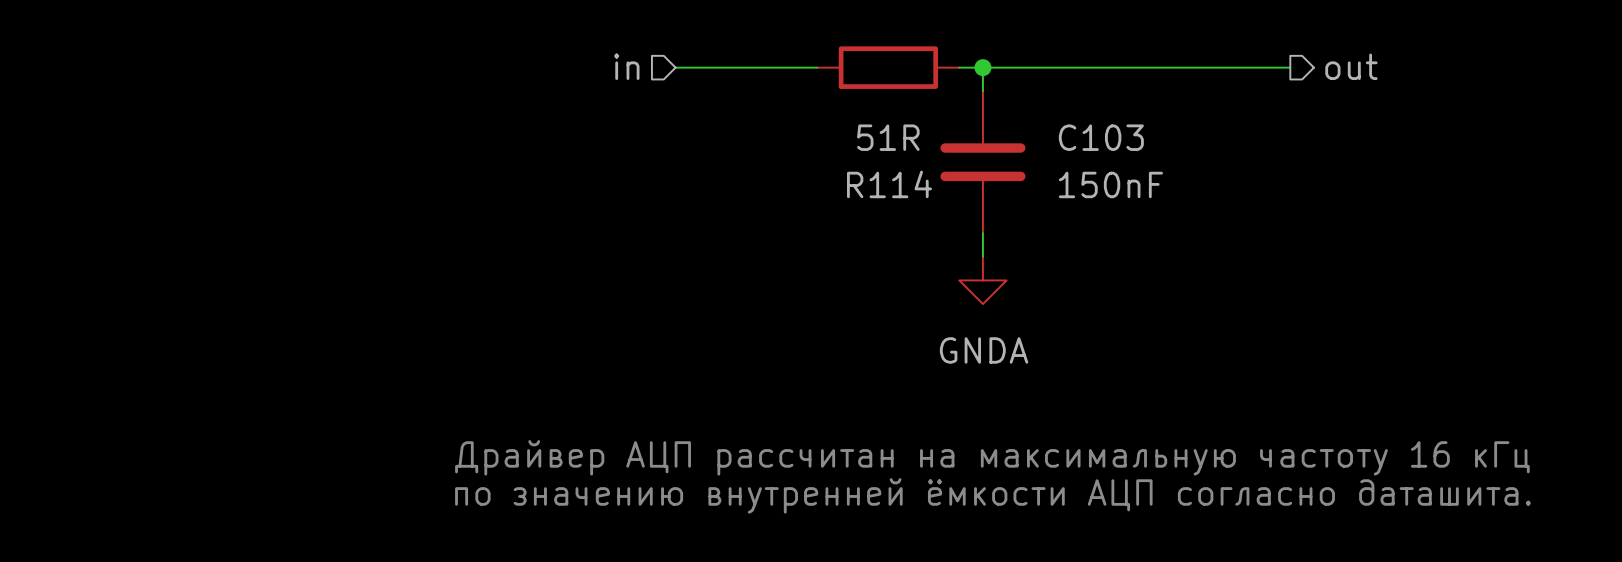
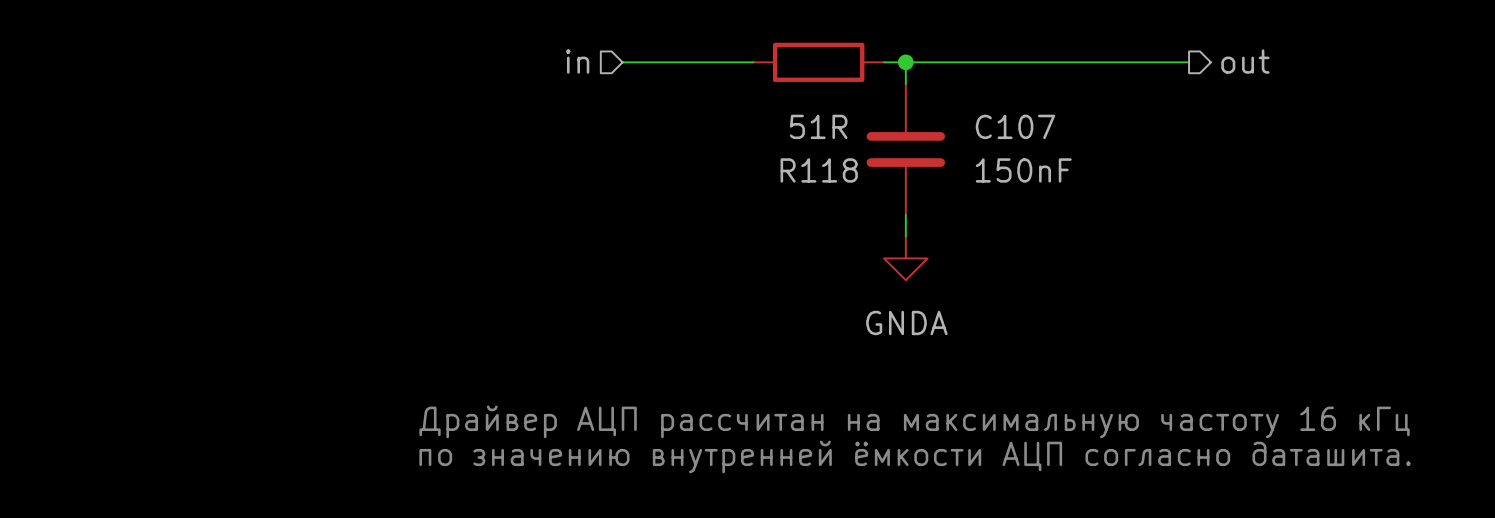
C103 name: C103 (1101, 137) -> C107 (1015, 126)
R114 name: R114 (889, 184) -> R118 (819, 170)

